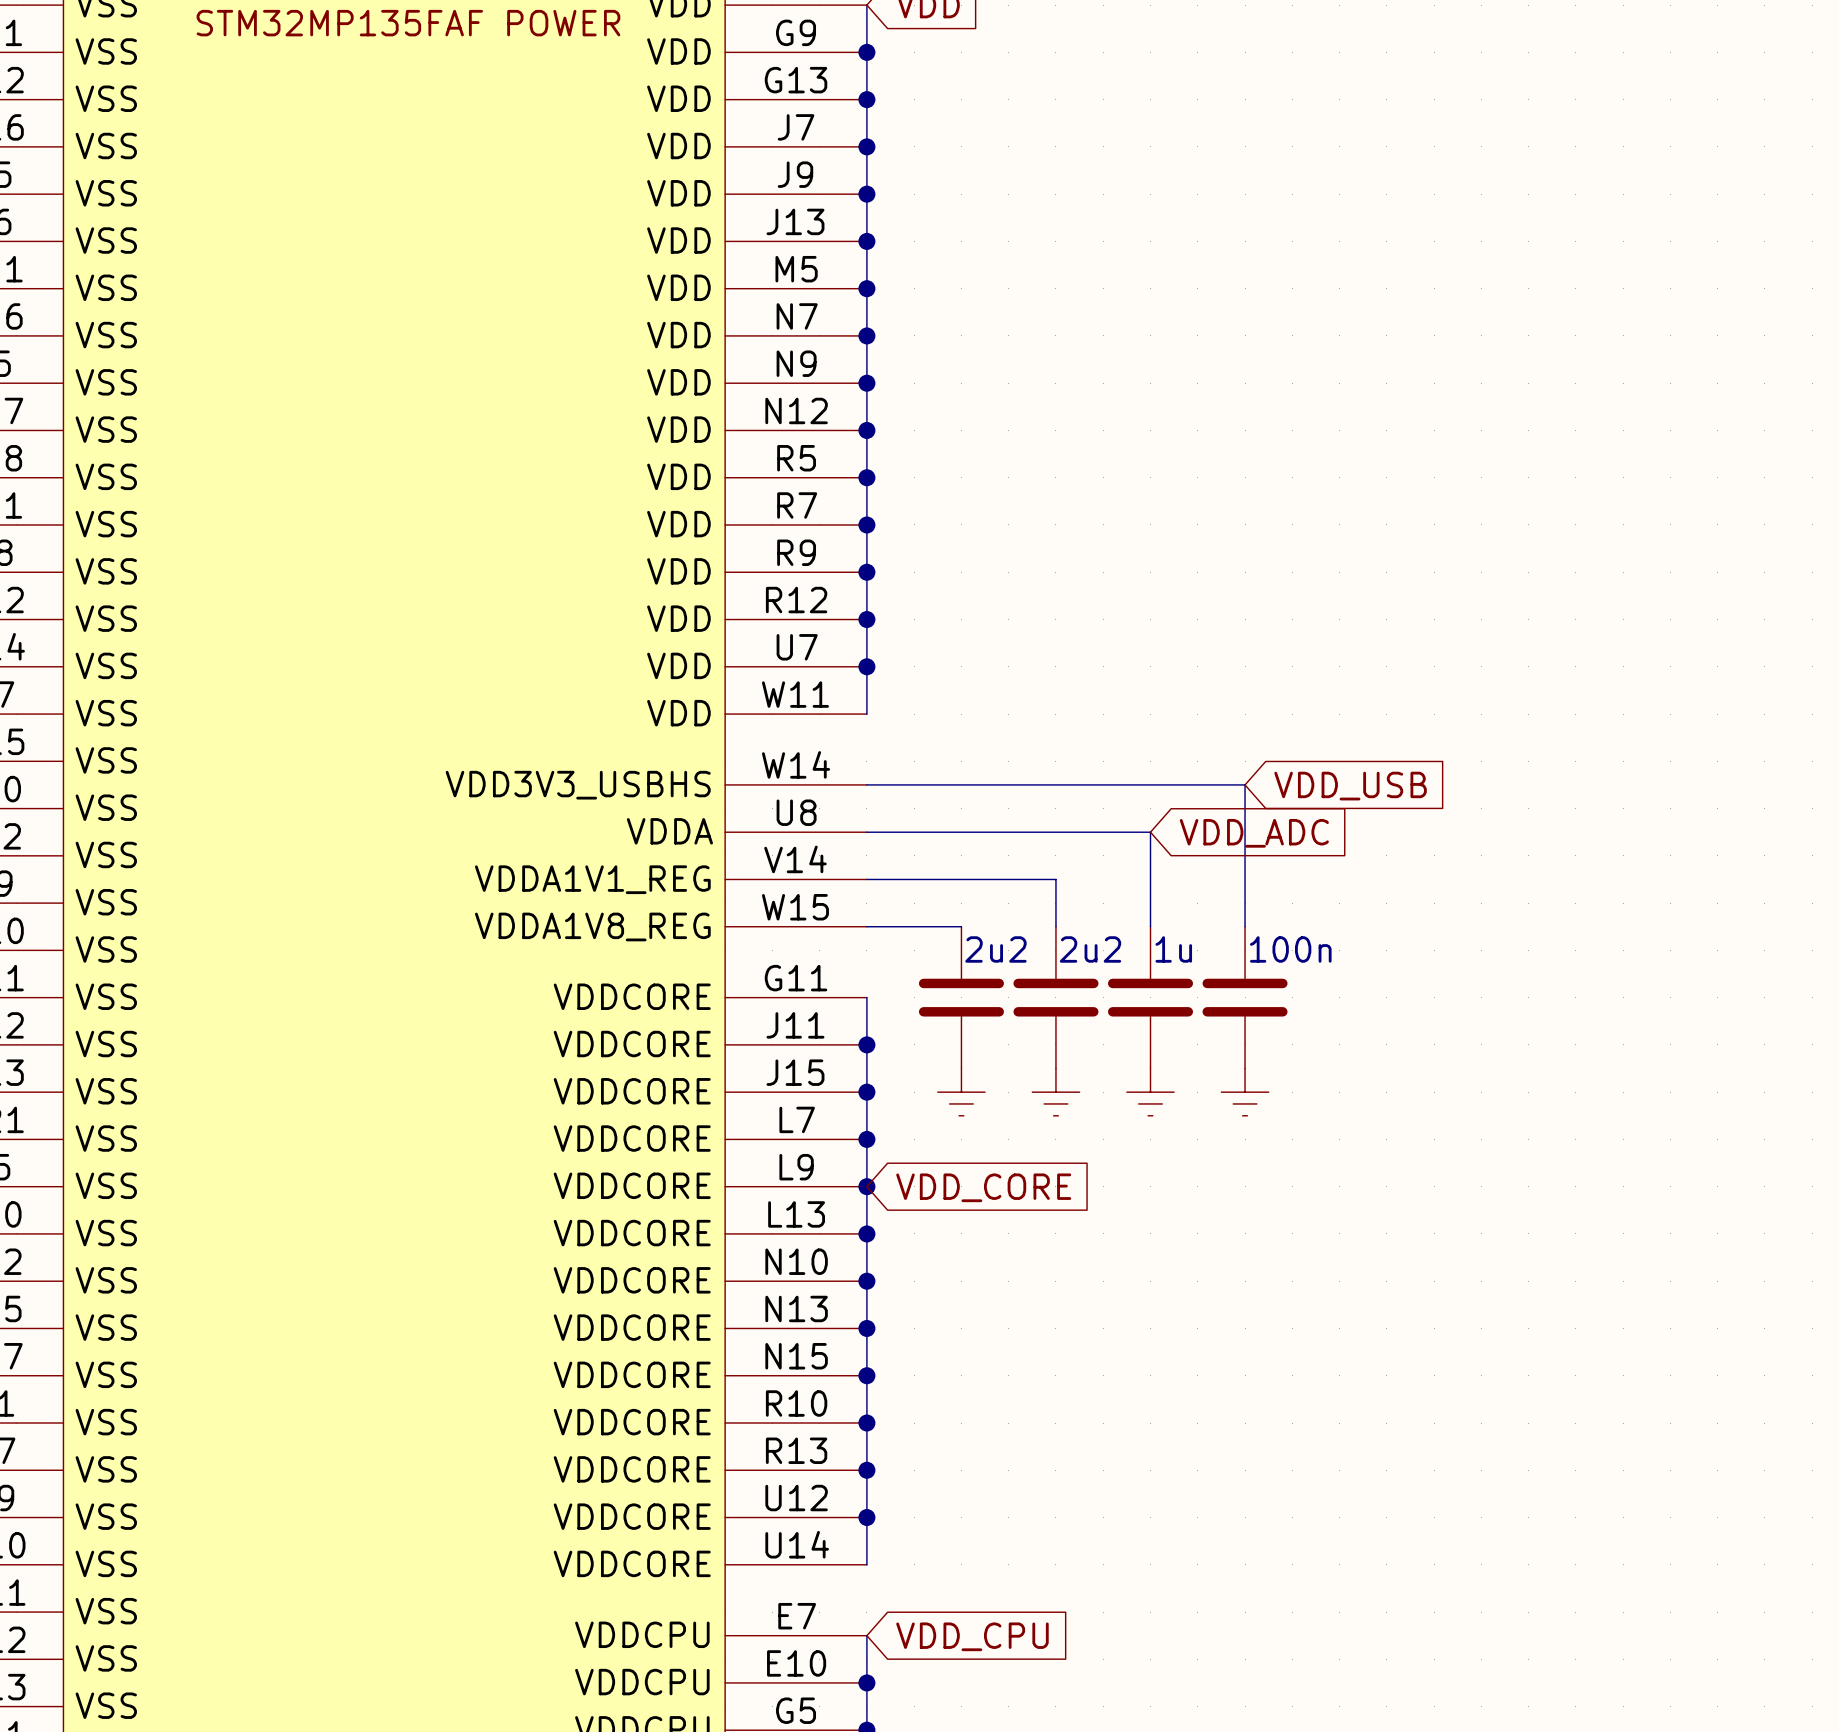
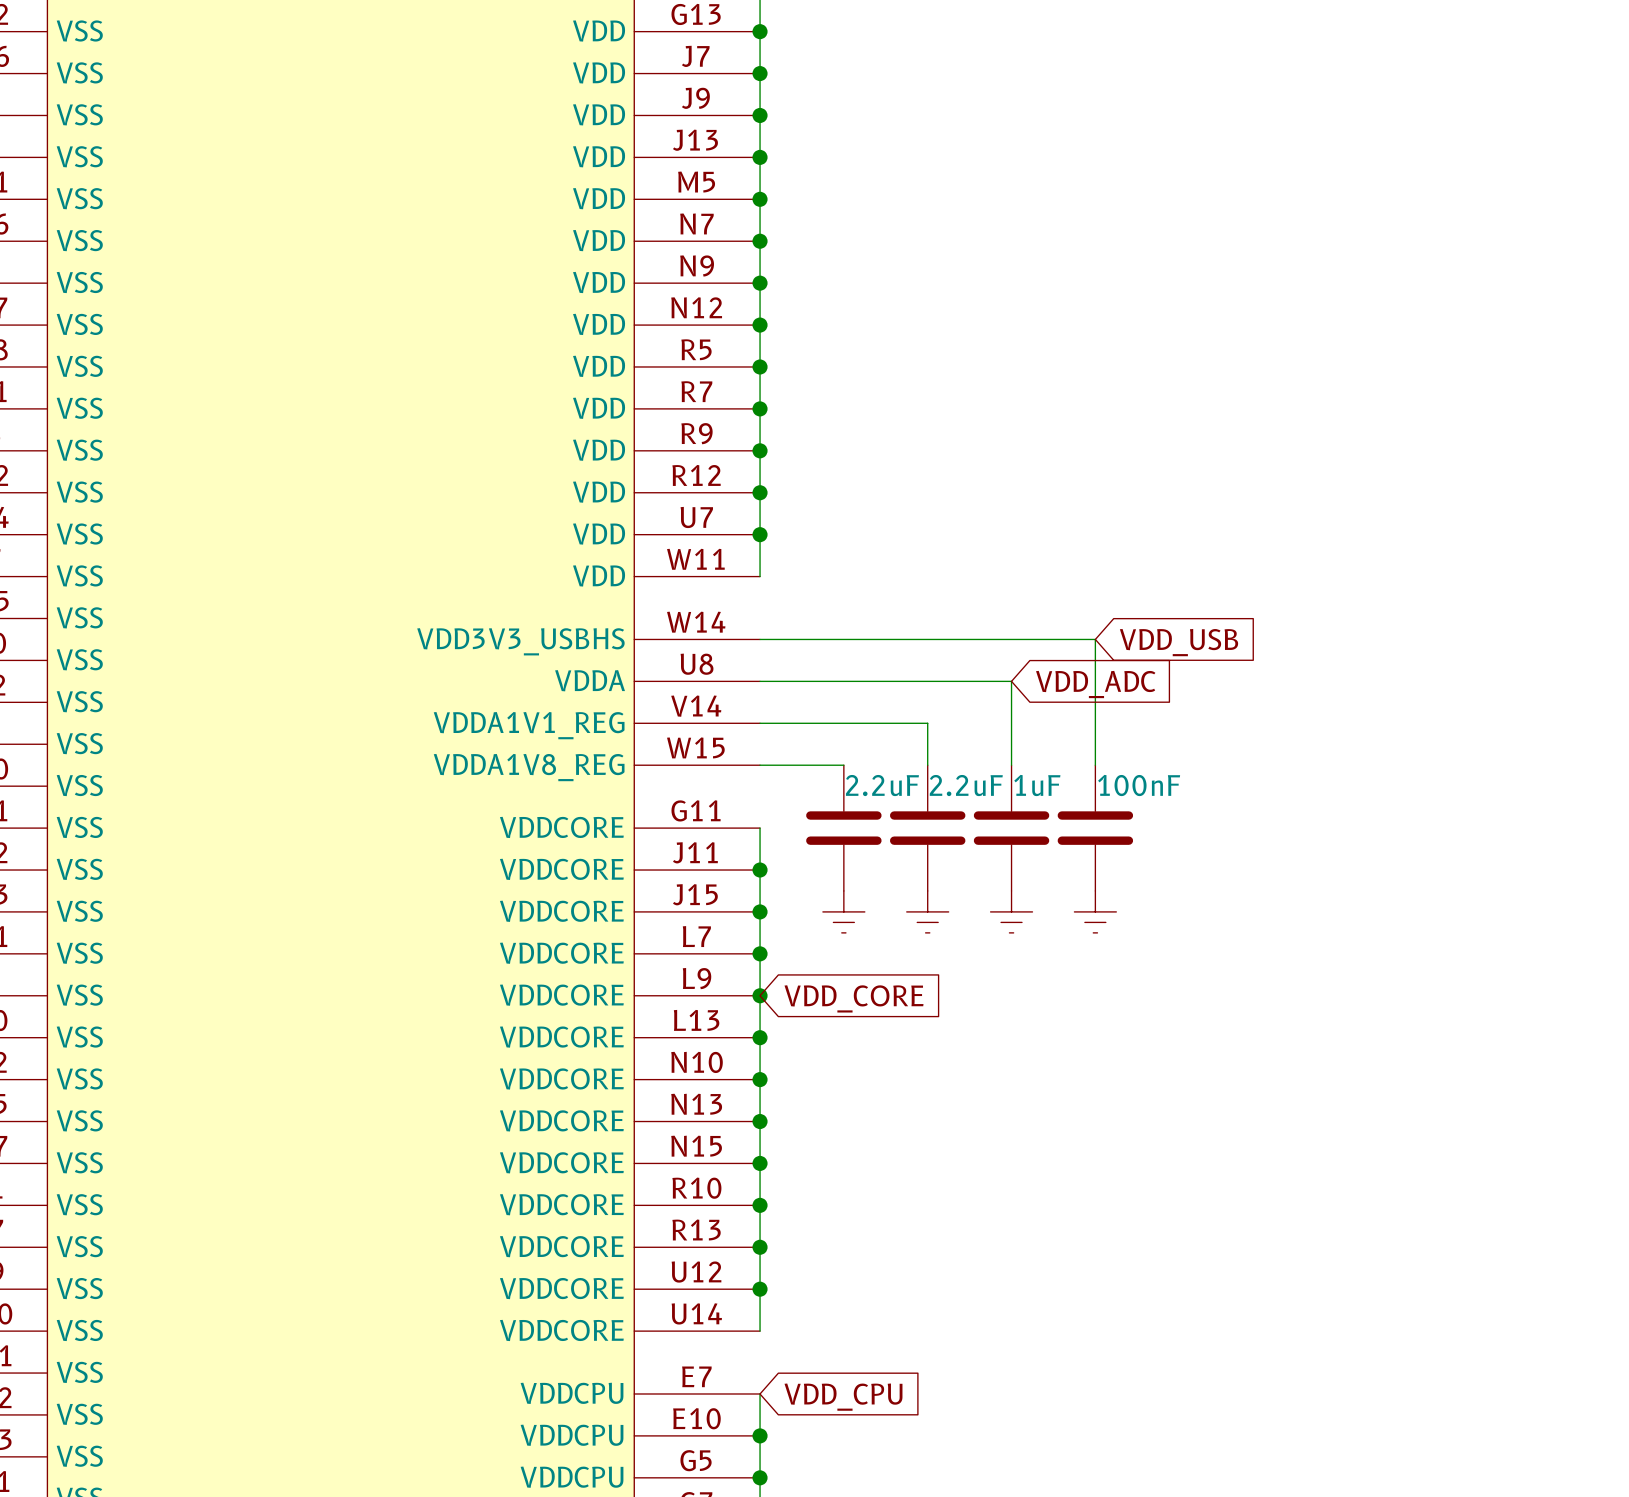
part value: 2u2 (995, 949) -> 2.2uF (882, 785)
part value: 2u2 (1090, 949) -> 2.2uF (966, 785)
part value: 1u (1173, 949) -> 1uF (1037, 785)
part value: 100n (1290, 949) -> 100nF (1139, 785)

